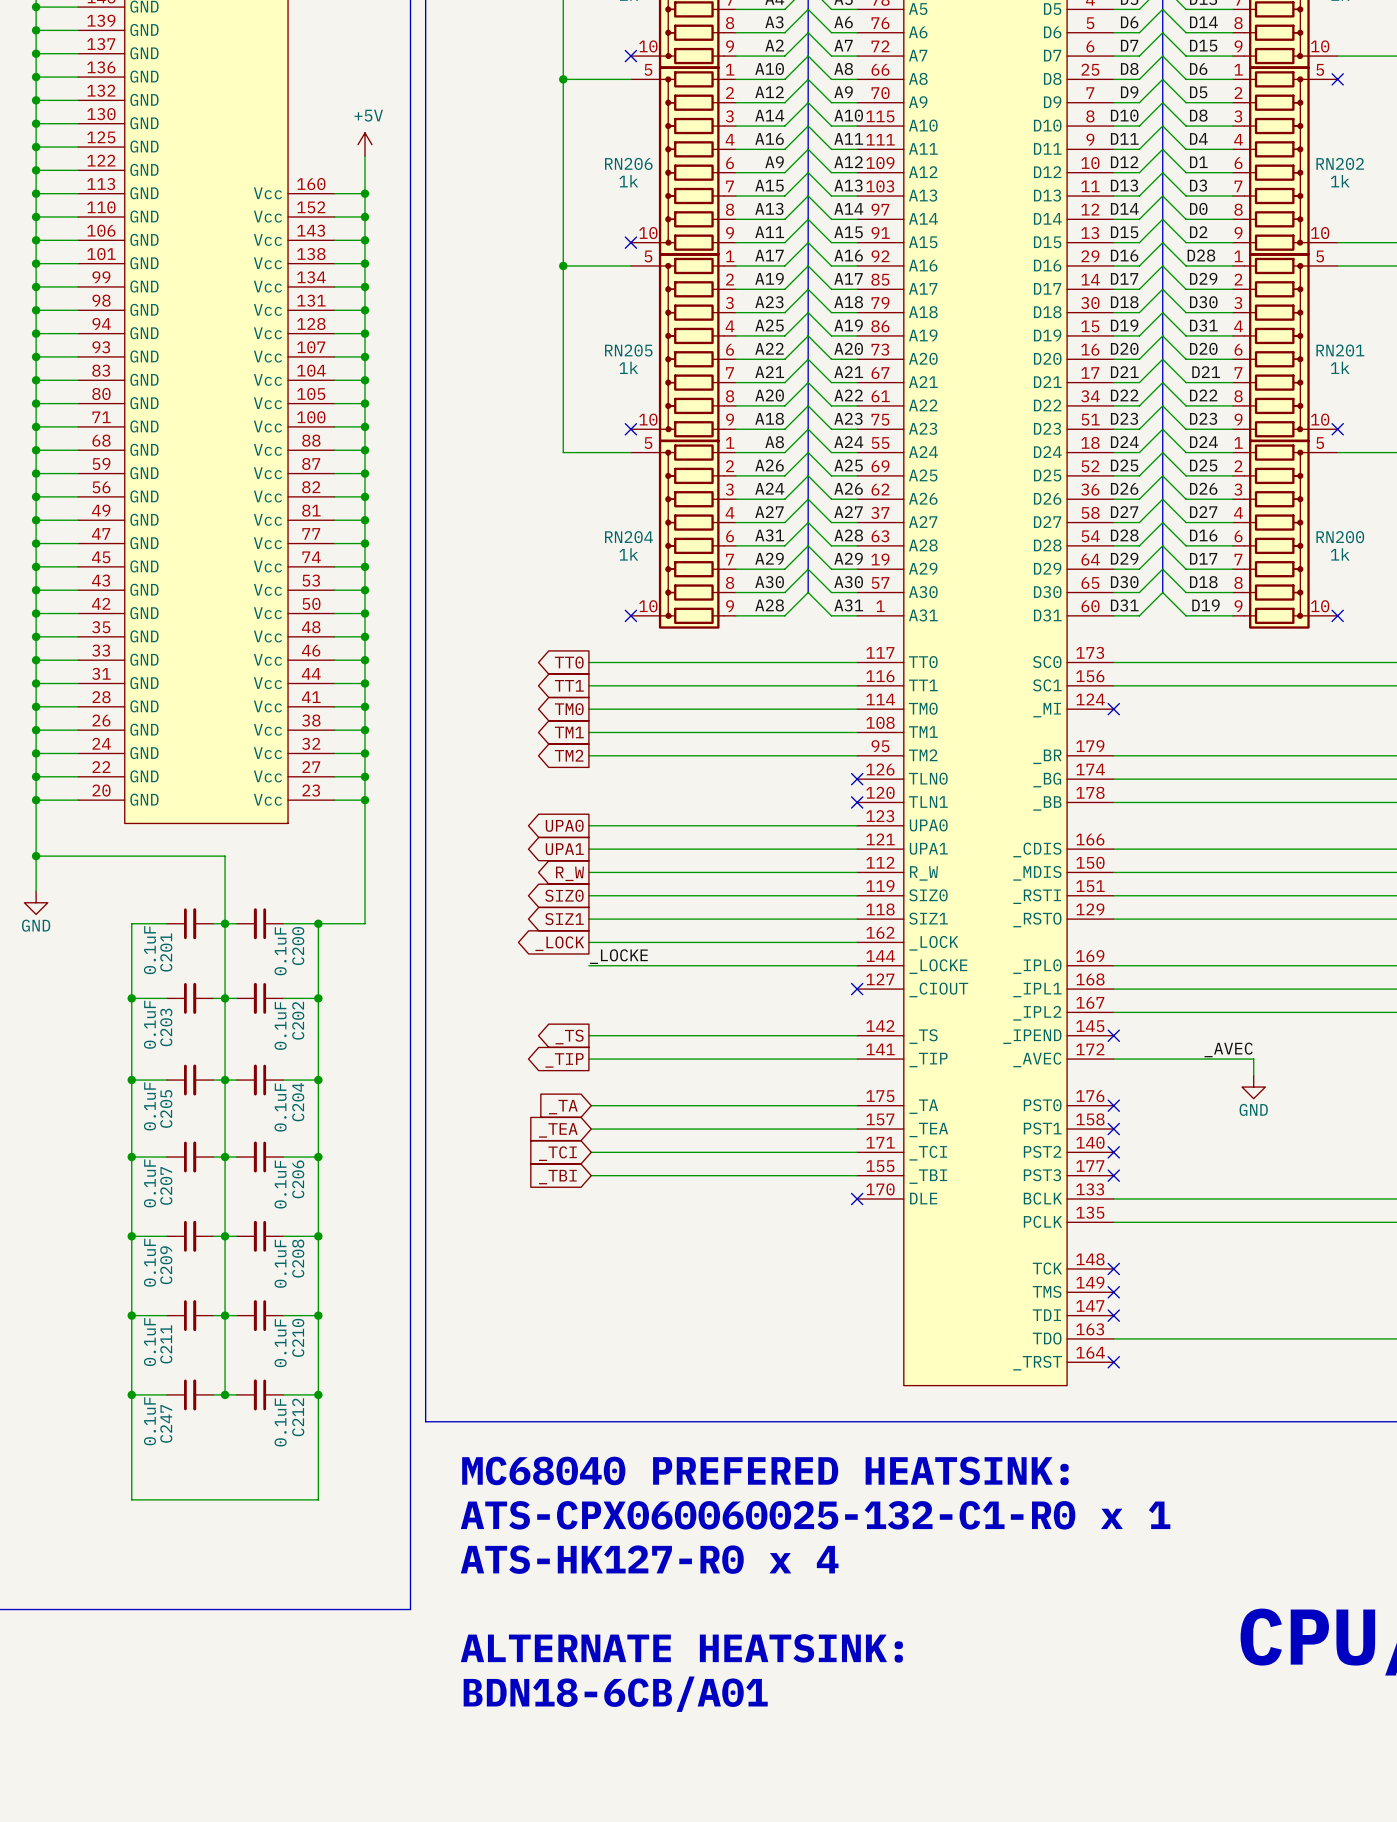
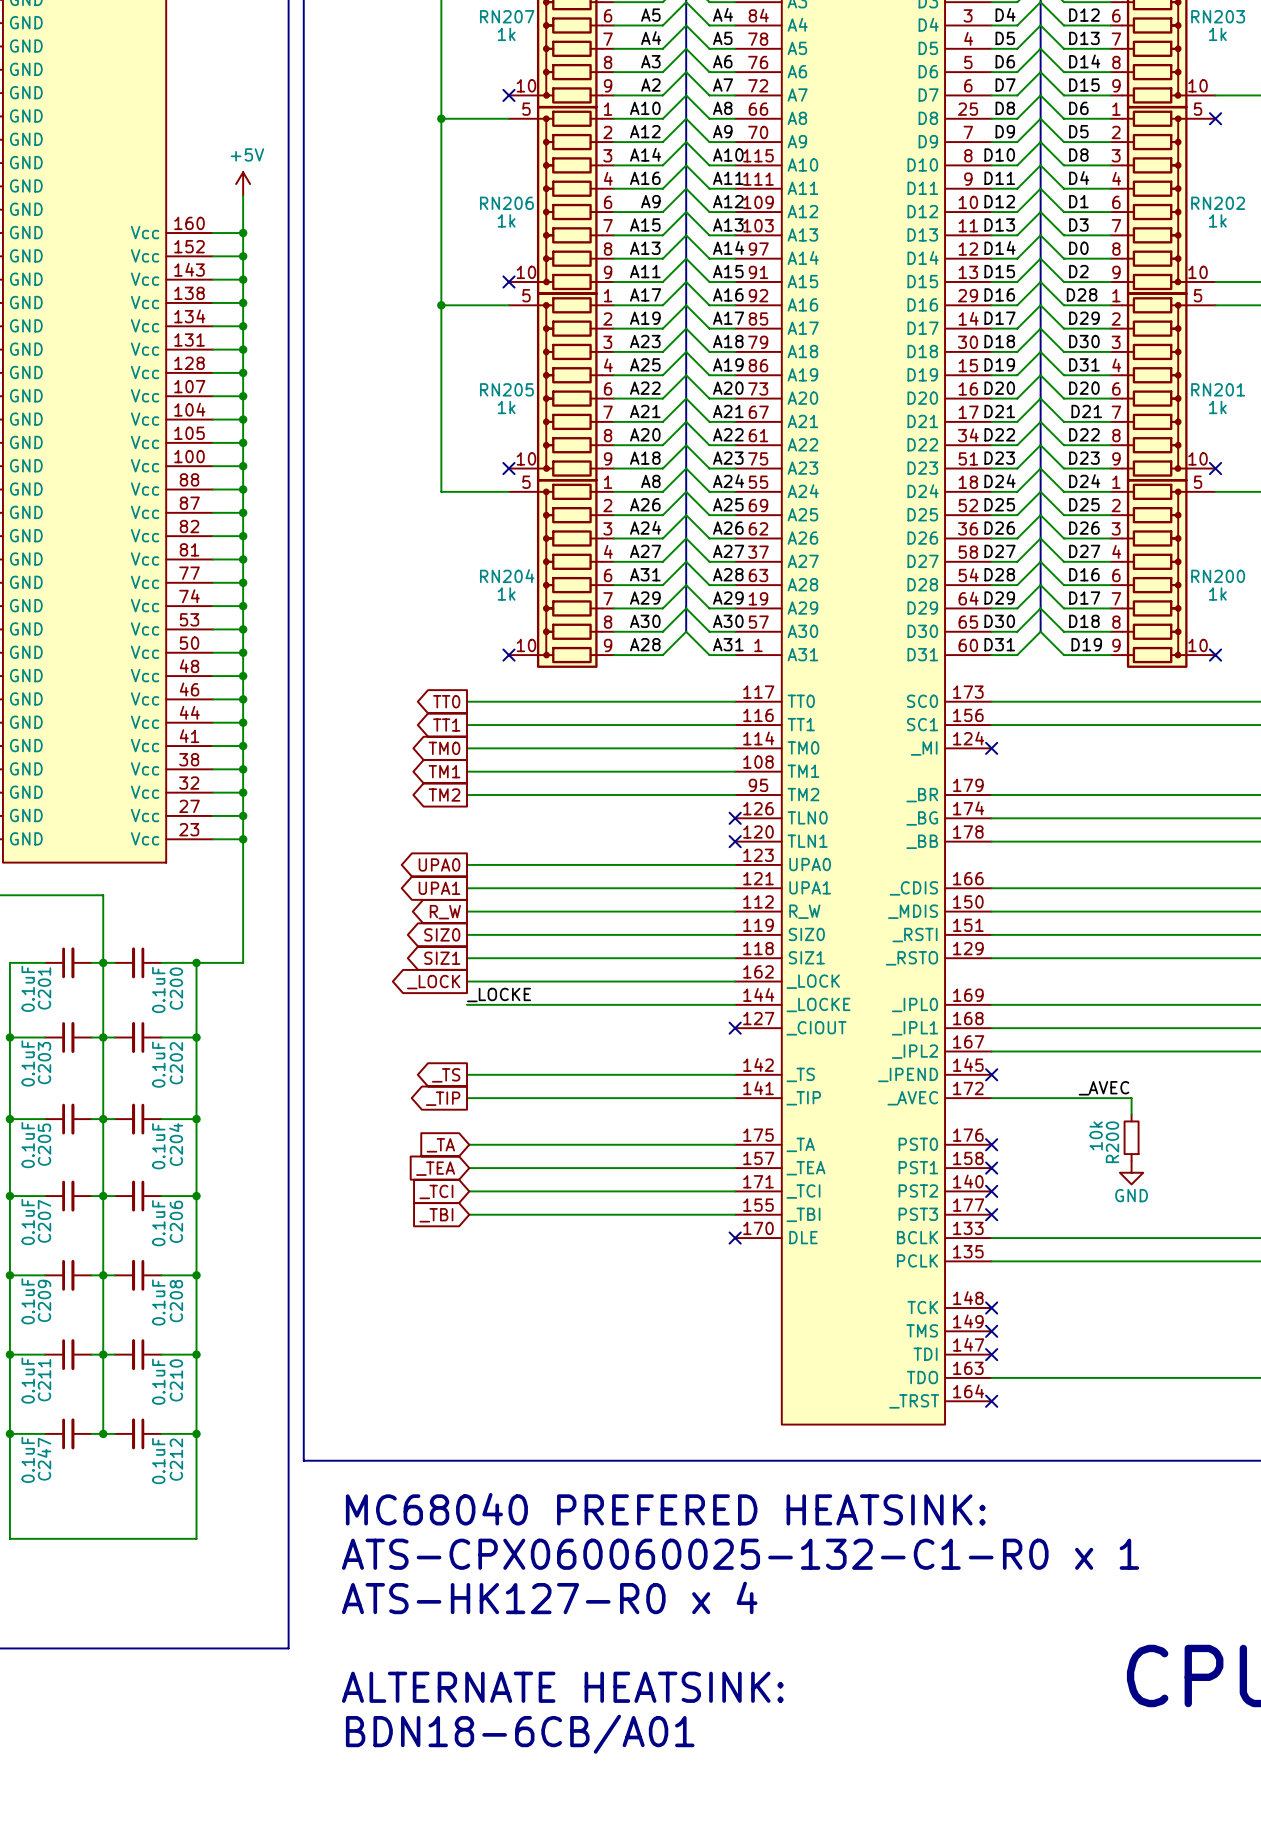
power symbol position: GND (1253, 1087) -> GND (1131, 1172)
R200: none -> 10k (1131, 1137)

